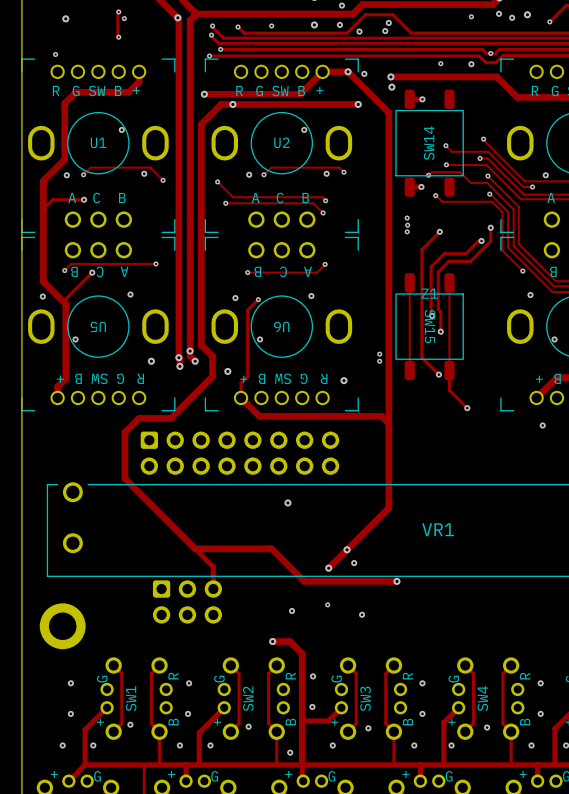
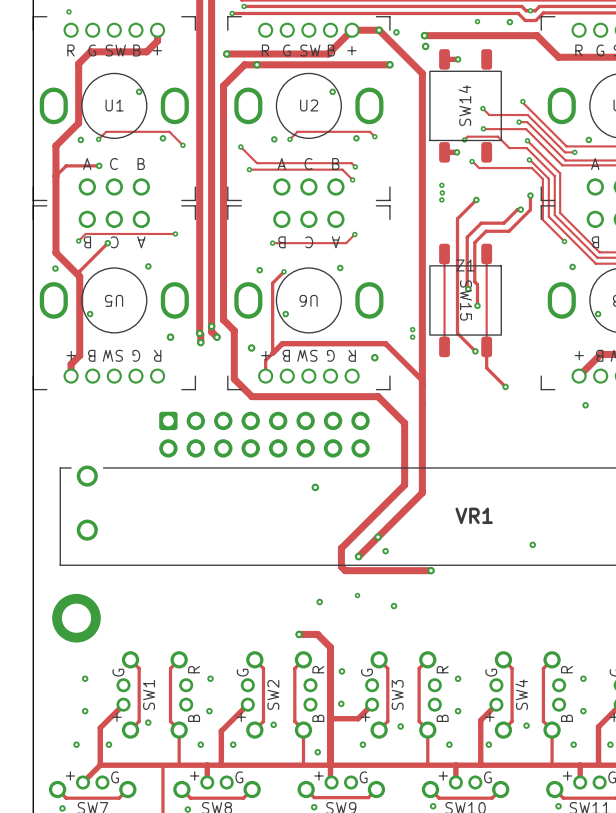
track: (211, 355) (212, 376) (170, 418) (139, 418) (124, 432) (124, 478) (195, 548) -> (234, 330) (234, 379) (251, 396) (378, 396) (404, 423) (404, 485) (341, 548) (341, 566) (345, 570)
track: none -> (272, 353) (282, 343) (385, 343) (422, 380) (422, 384)
track: (241, 397) (259, 416) (381, 416) (388, 423) -> none
track: (195, 548) (271, 548) (304, 581) (316, 581) -> none
track: (195, 548) (213, 566) (213, 589) -> none
via: none -> (532, 544)
part: (187, 601) -> none

